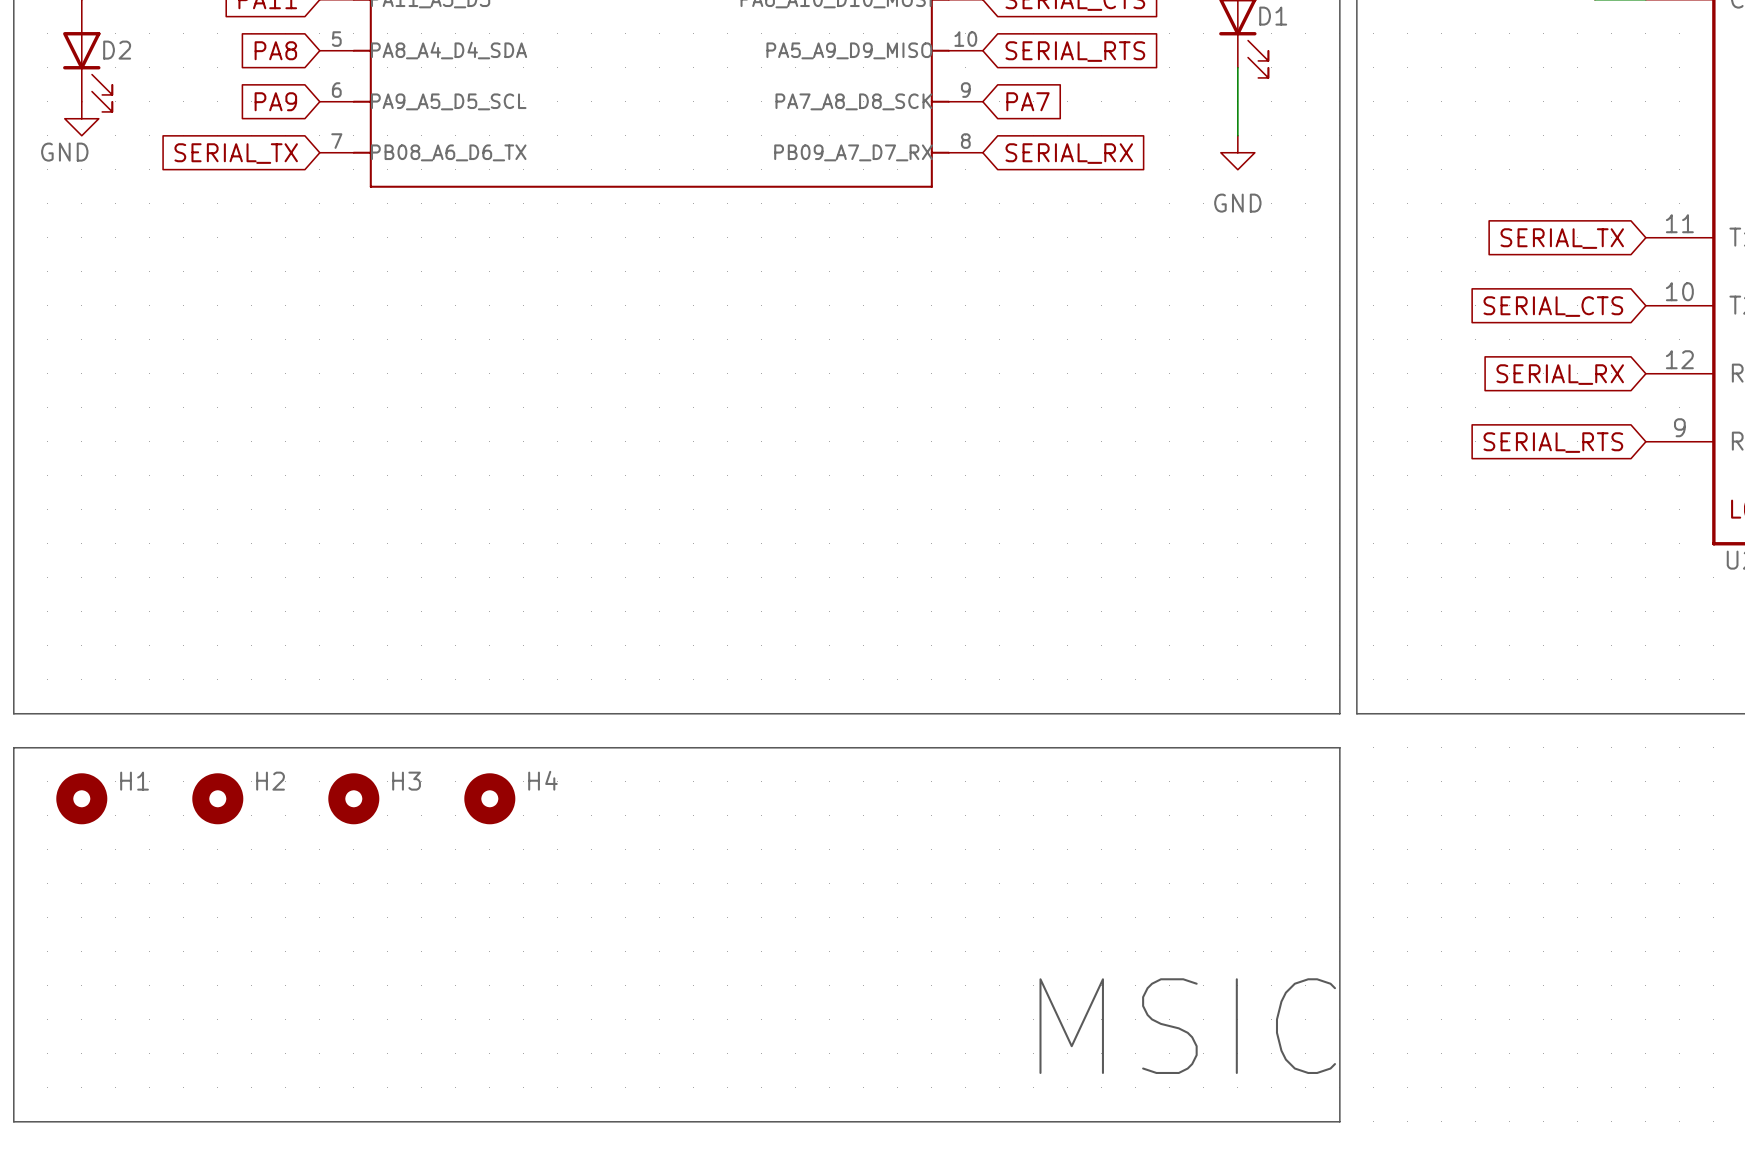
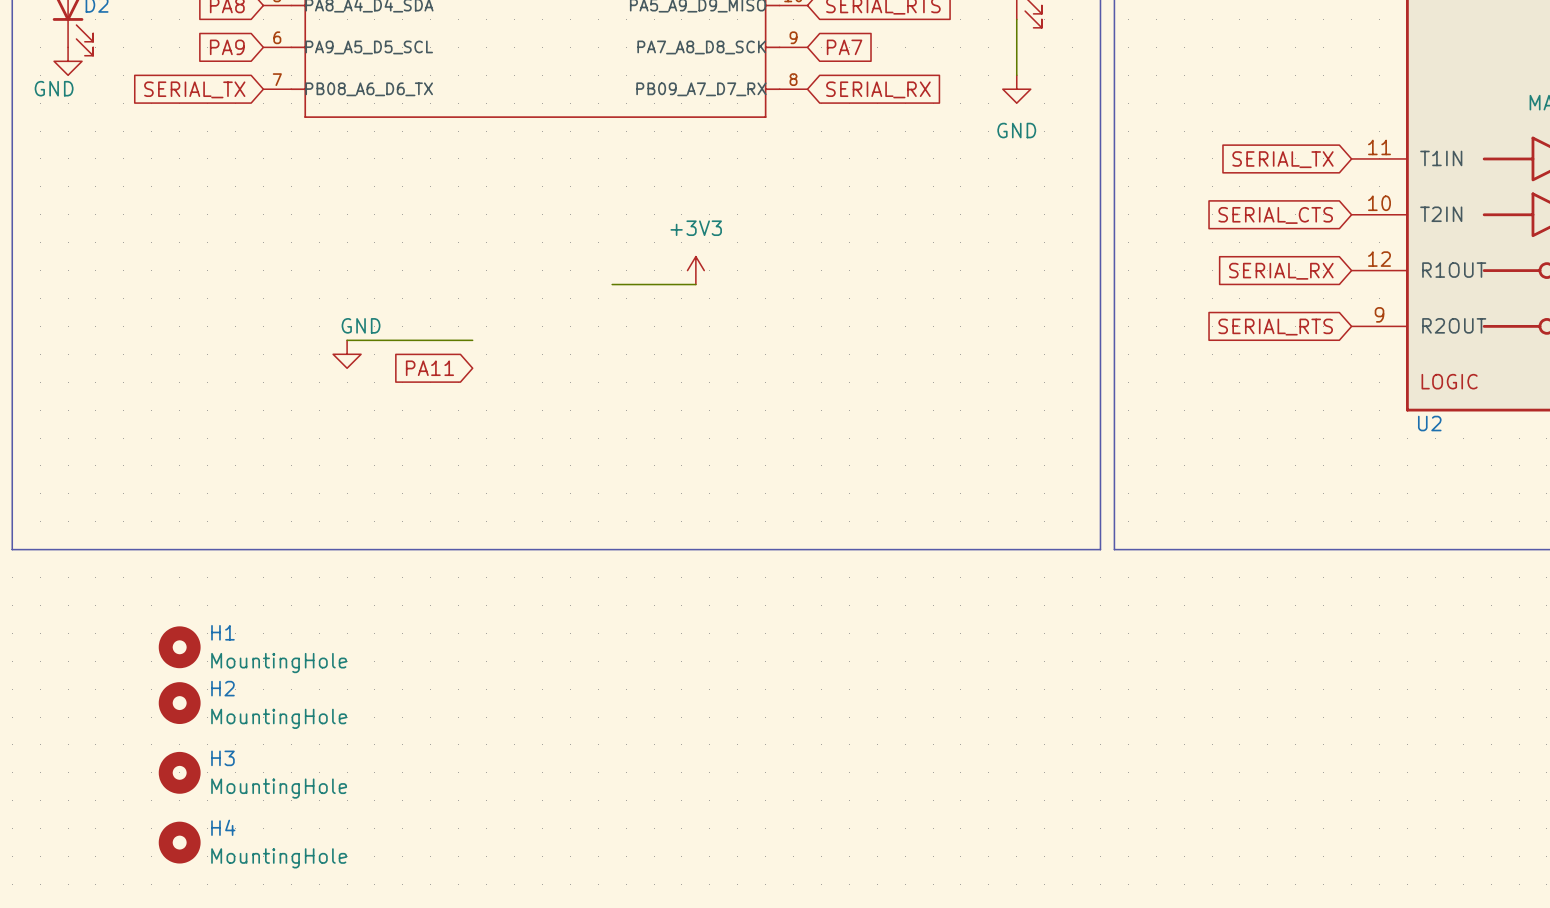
power symbol: none -> +3V3 (695, 270)
wire: none -> (612, 284) (695, 284)
wire: none -> (347, 340) (472, 340)
power symbol: none -> GND (347, 354)
global label: none -> PA11 (429, 368)
line: (13, 747) (13, 1121) (1339, 1121) (1339, 747) (13, 747) -> none
H1 position: (81, 798) -> (179, 647)
H2 position: (217, 798) -> (179, 703)
H3 position: (353, 798) -> (179, 772)
H4 position: (489, 798) -> (179, 842)
H1 value: none -> MountingHole (279, 663)
H2 value: none -> MountingHole (279, 718)
H3 value: none -> MountingHole (279, 788)
text: MSIC (1187, 1026) -> none
H4 value: none -> MountingHole (279, 858)

